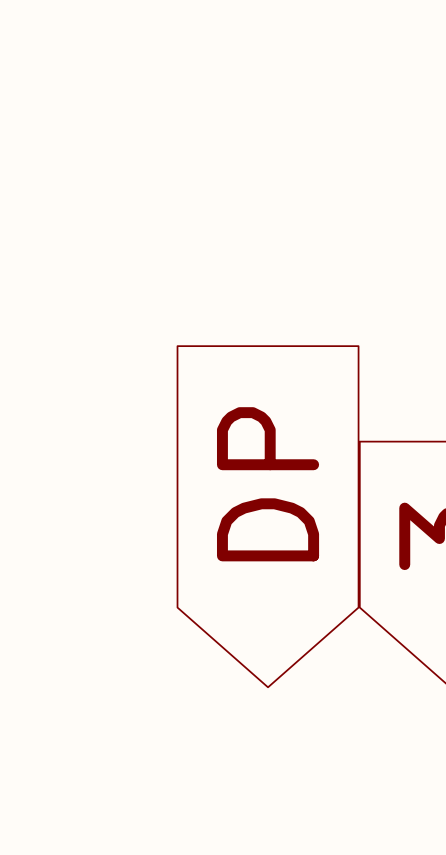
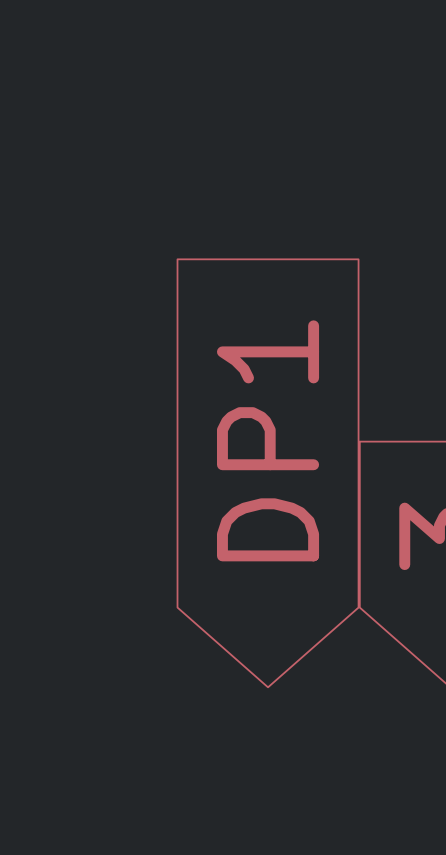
global label: DP (268, 484) -> DP1 (268, 440)

